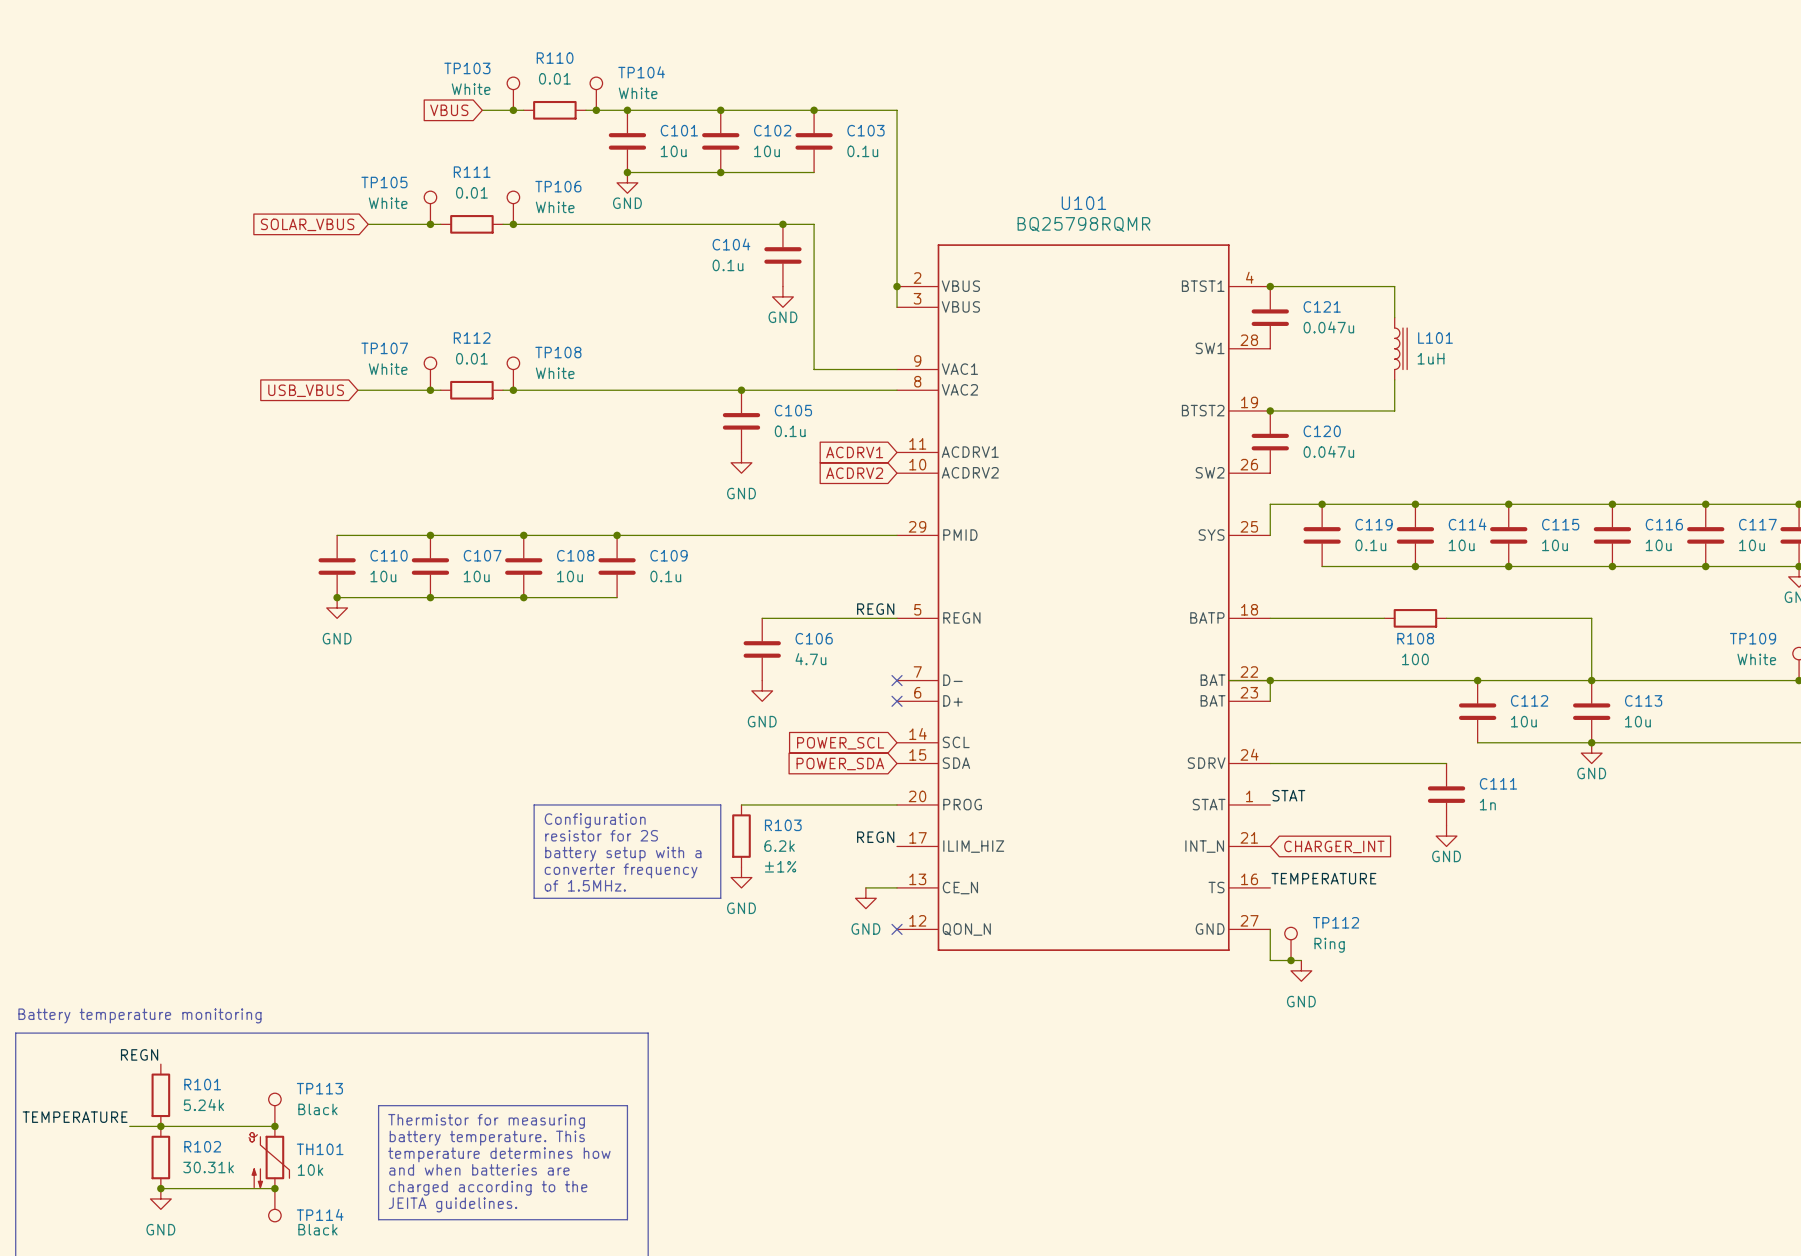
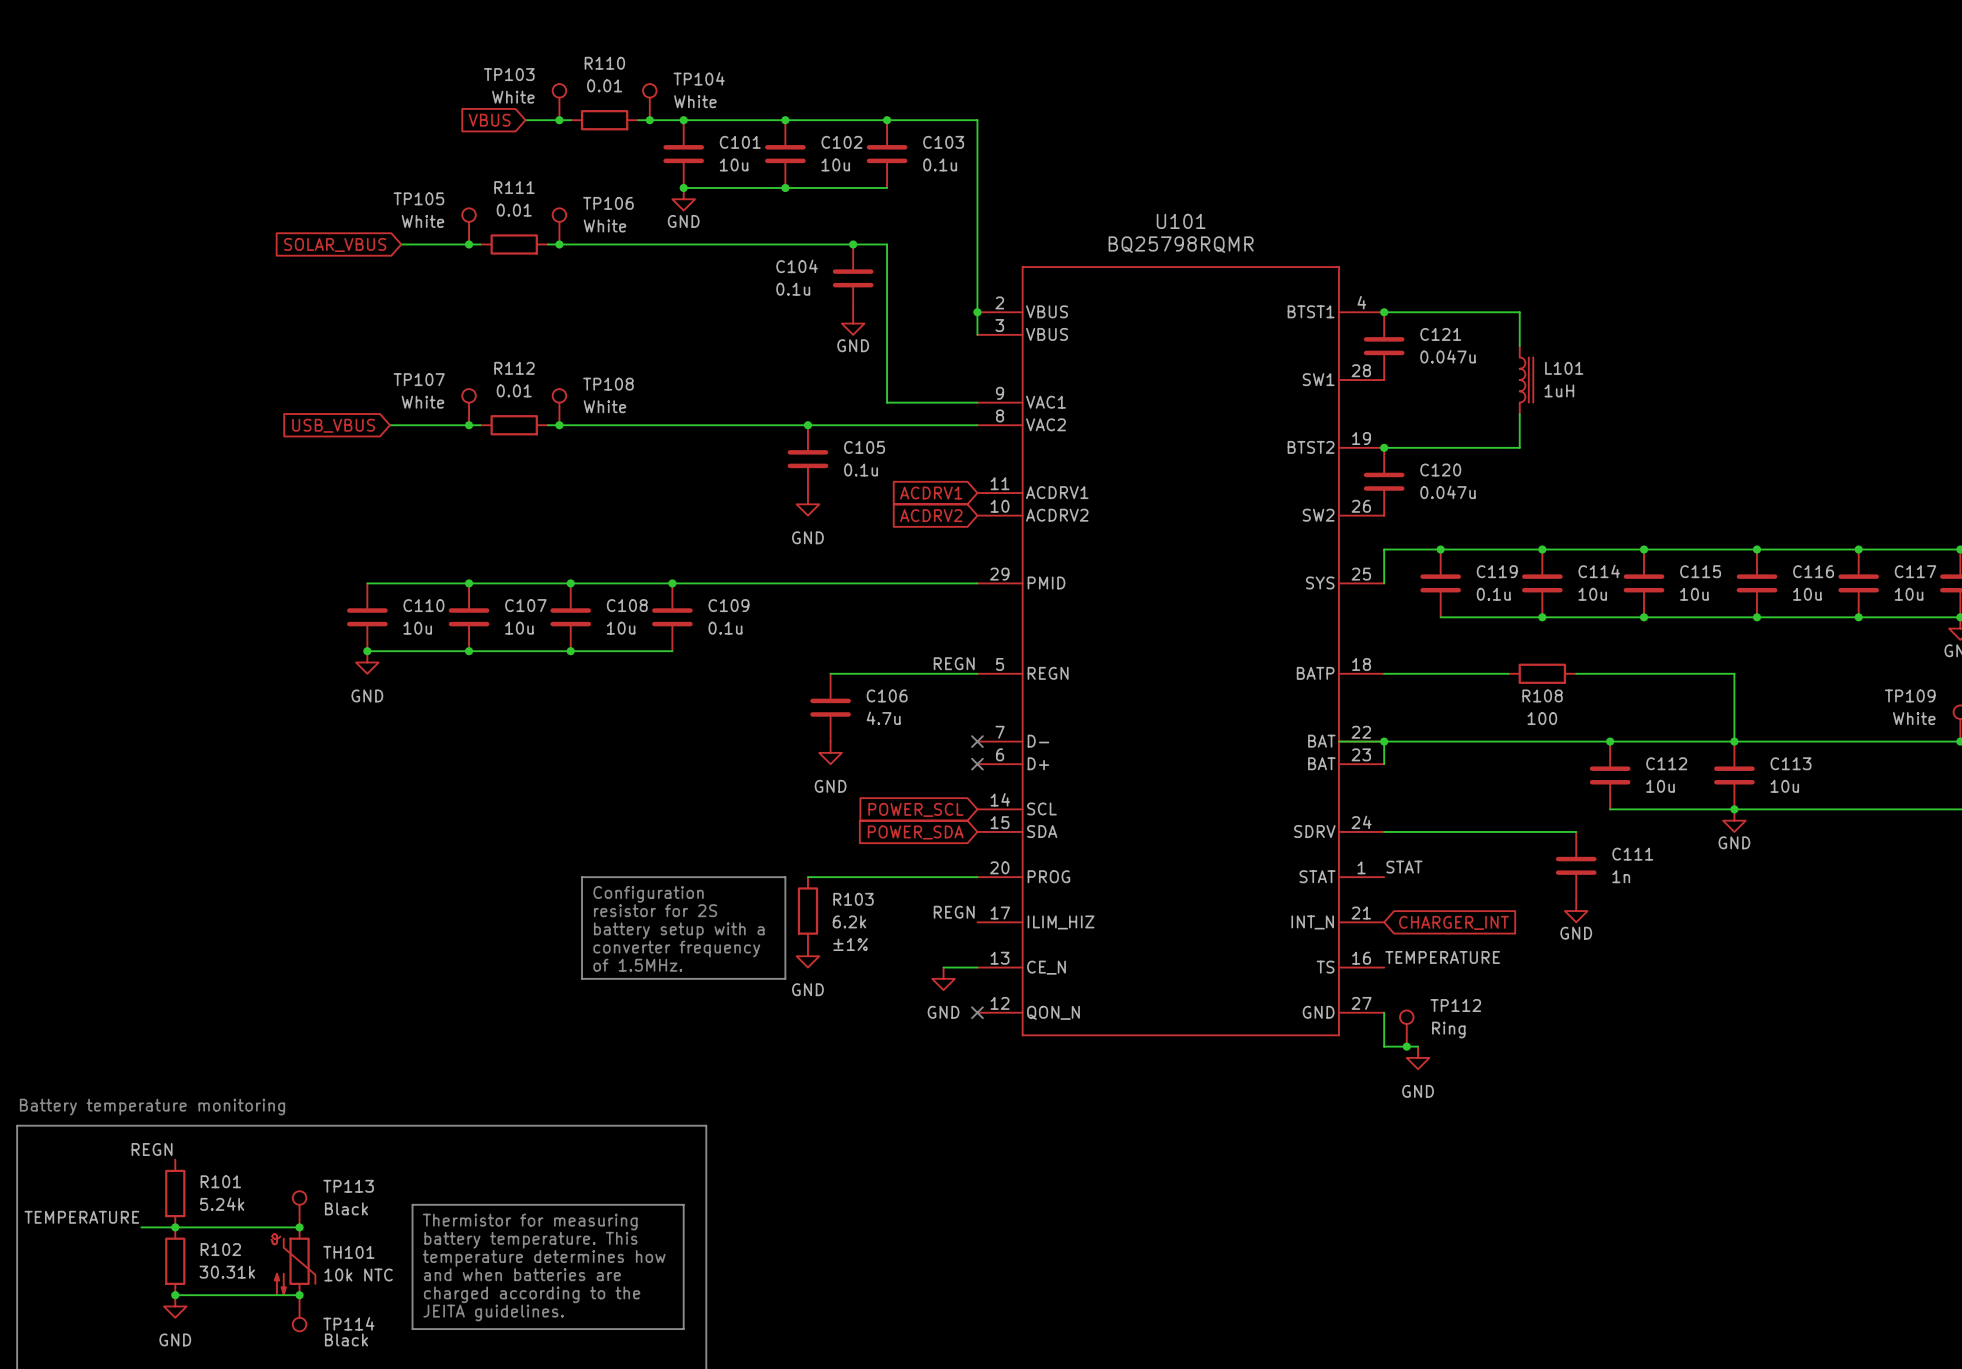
TH101 value: 10k (310, 1170) -> 10k NTC (358, 1274)

